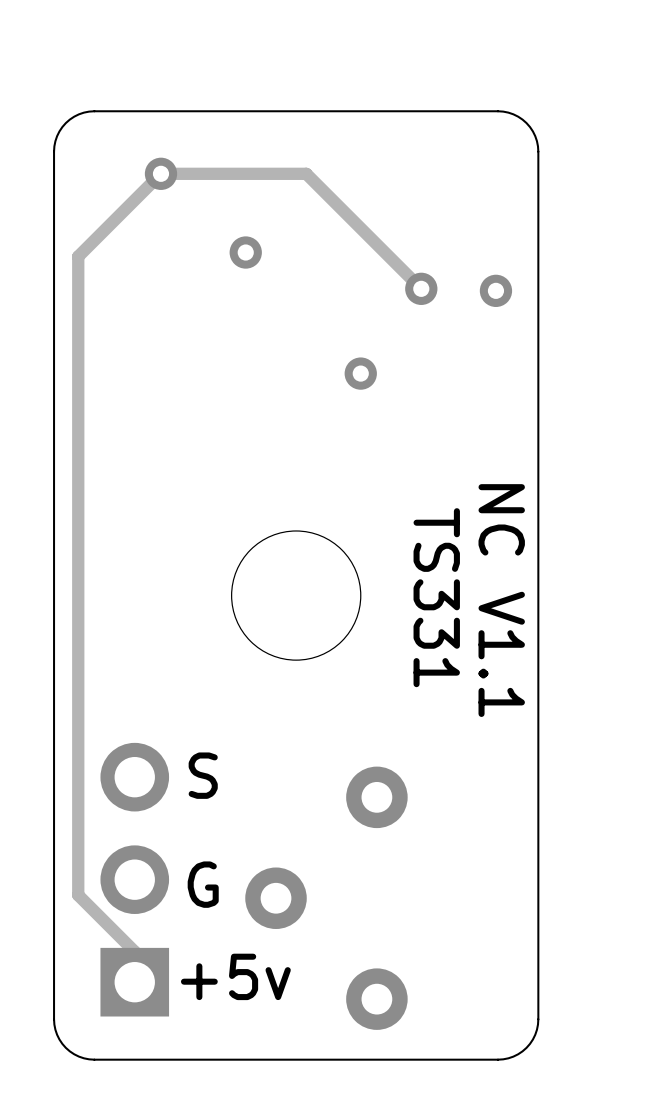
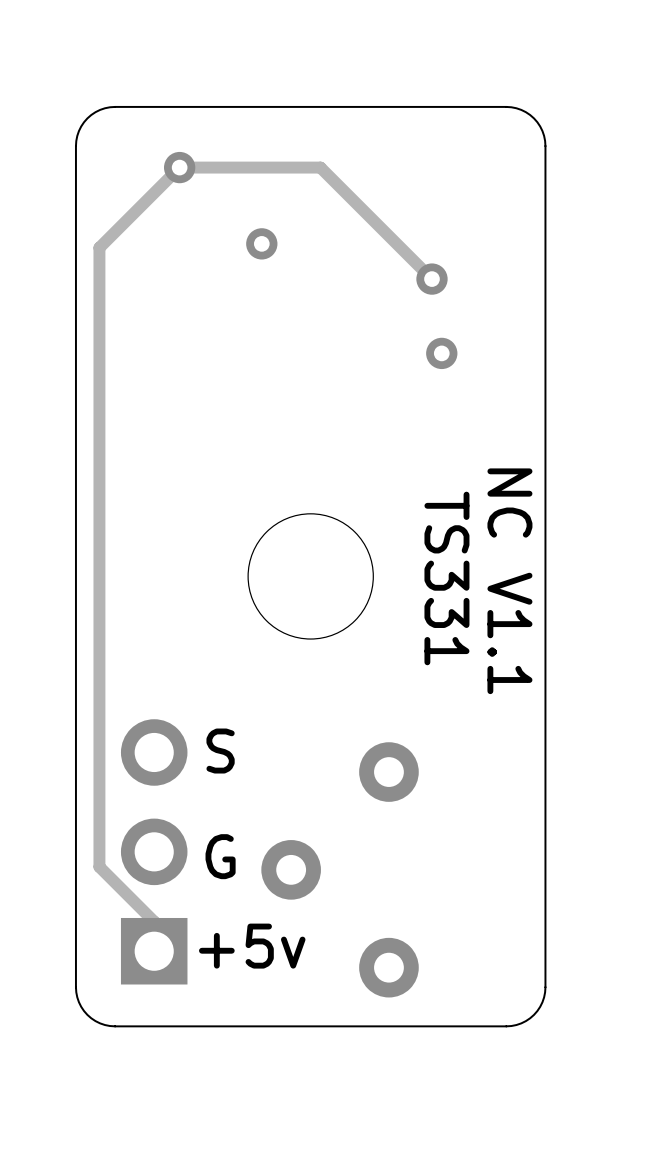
via: (495, 290) -> none
via: none -> (441, 353)
via: (360, 373) -> none

